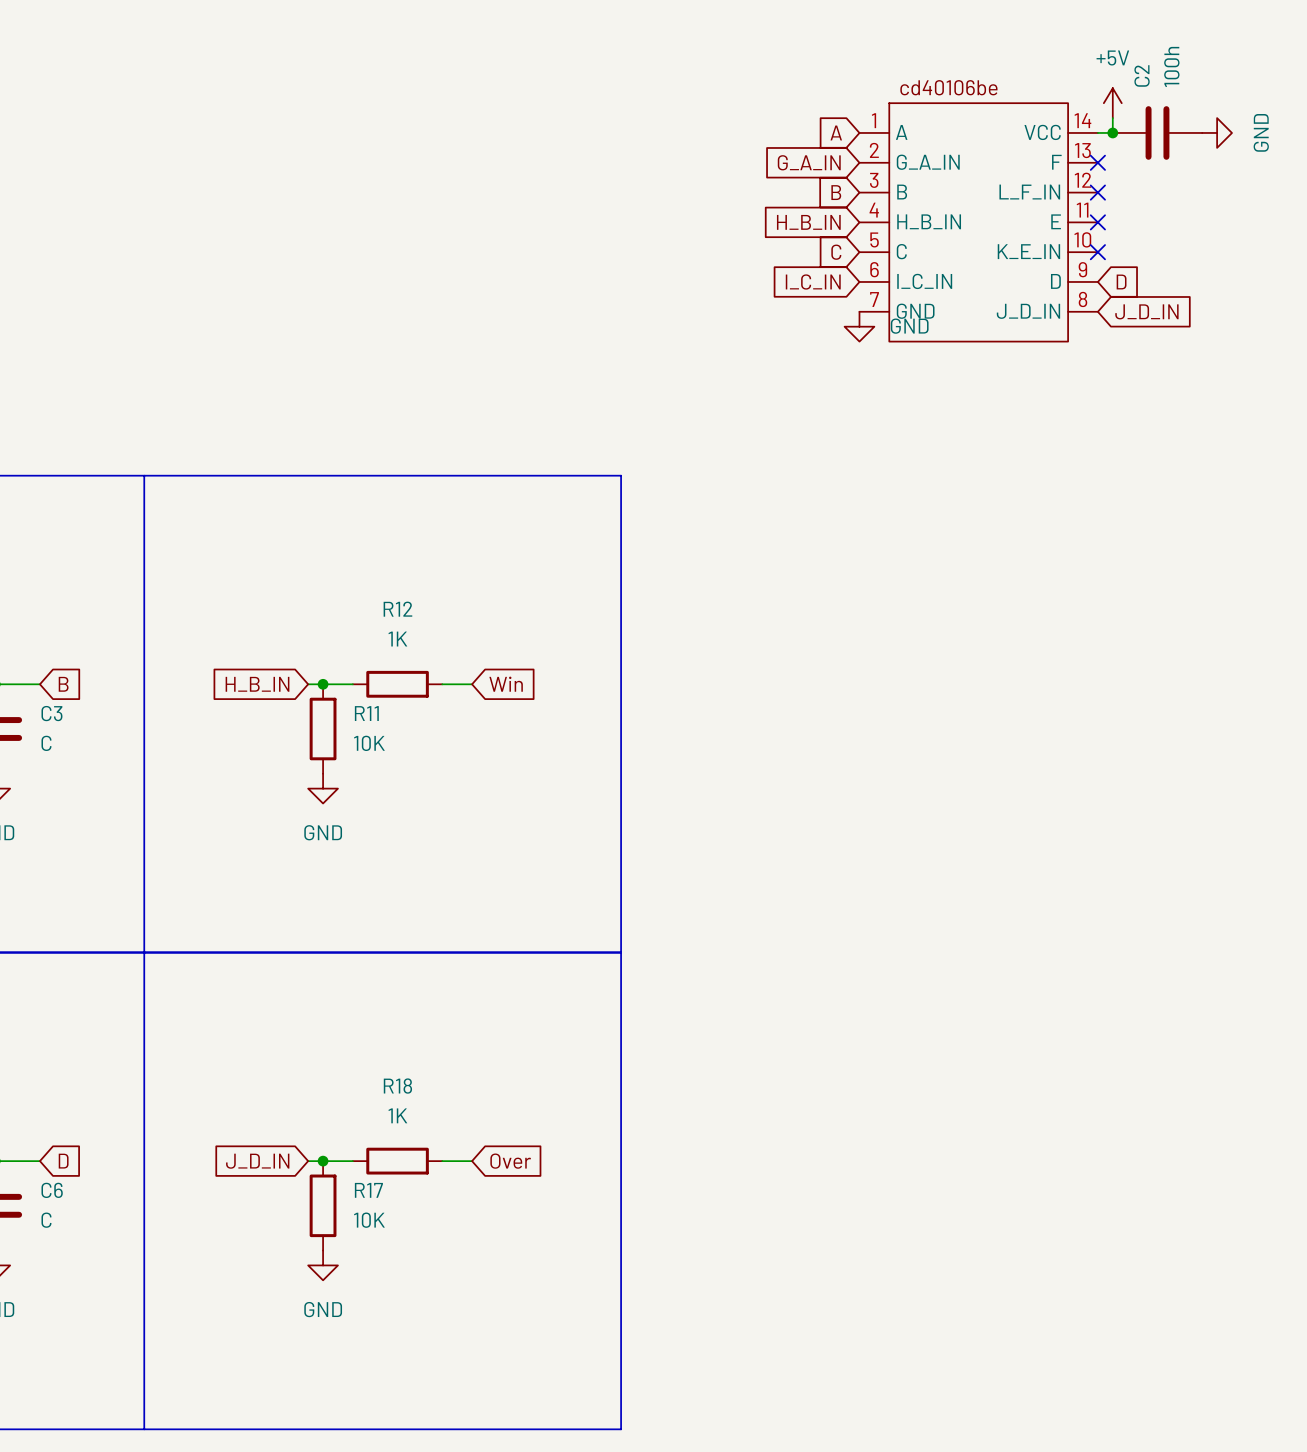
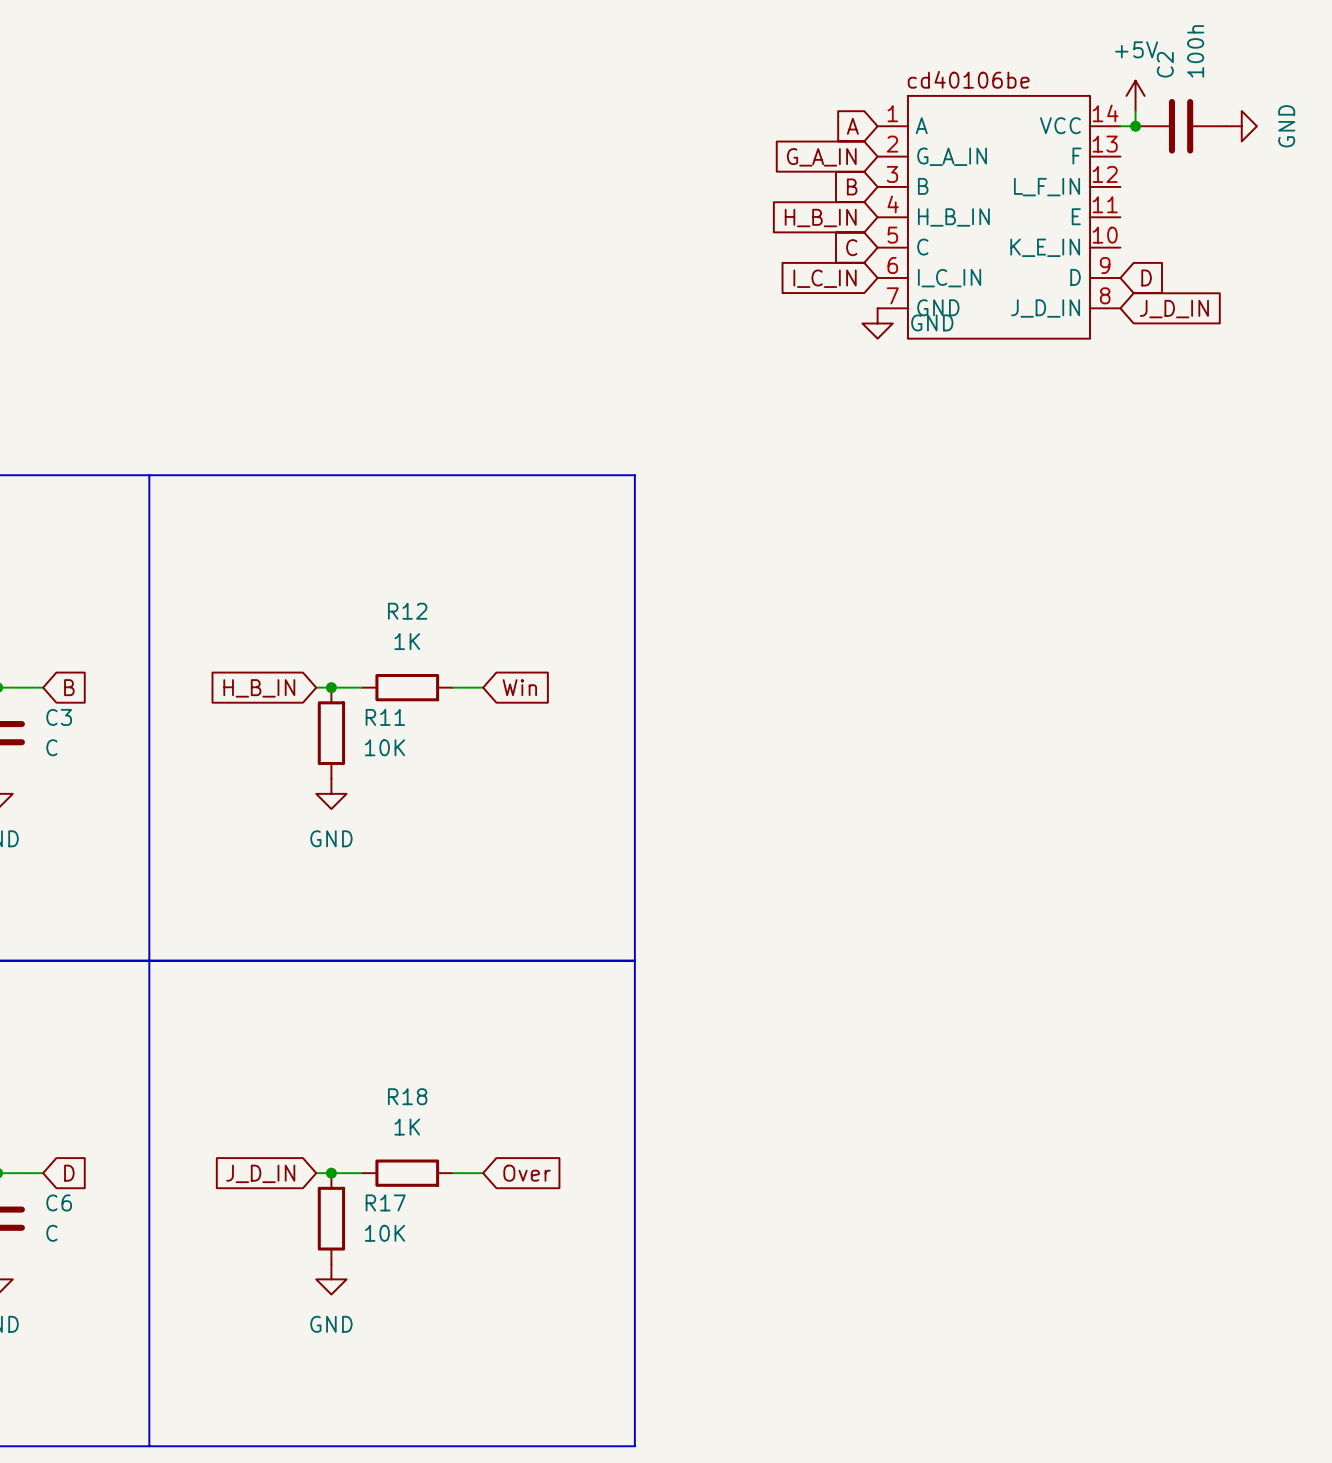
no-connect mark: (1097, 162) -> none
no-connect mark: (1097, 192) -> none
no-connect mark: (1097, 222) -> none
no-connect mark: (1097, 252) -> none

